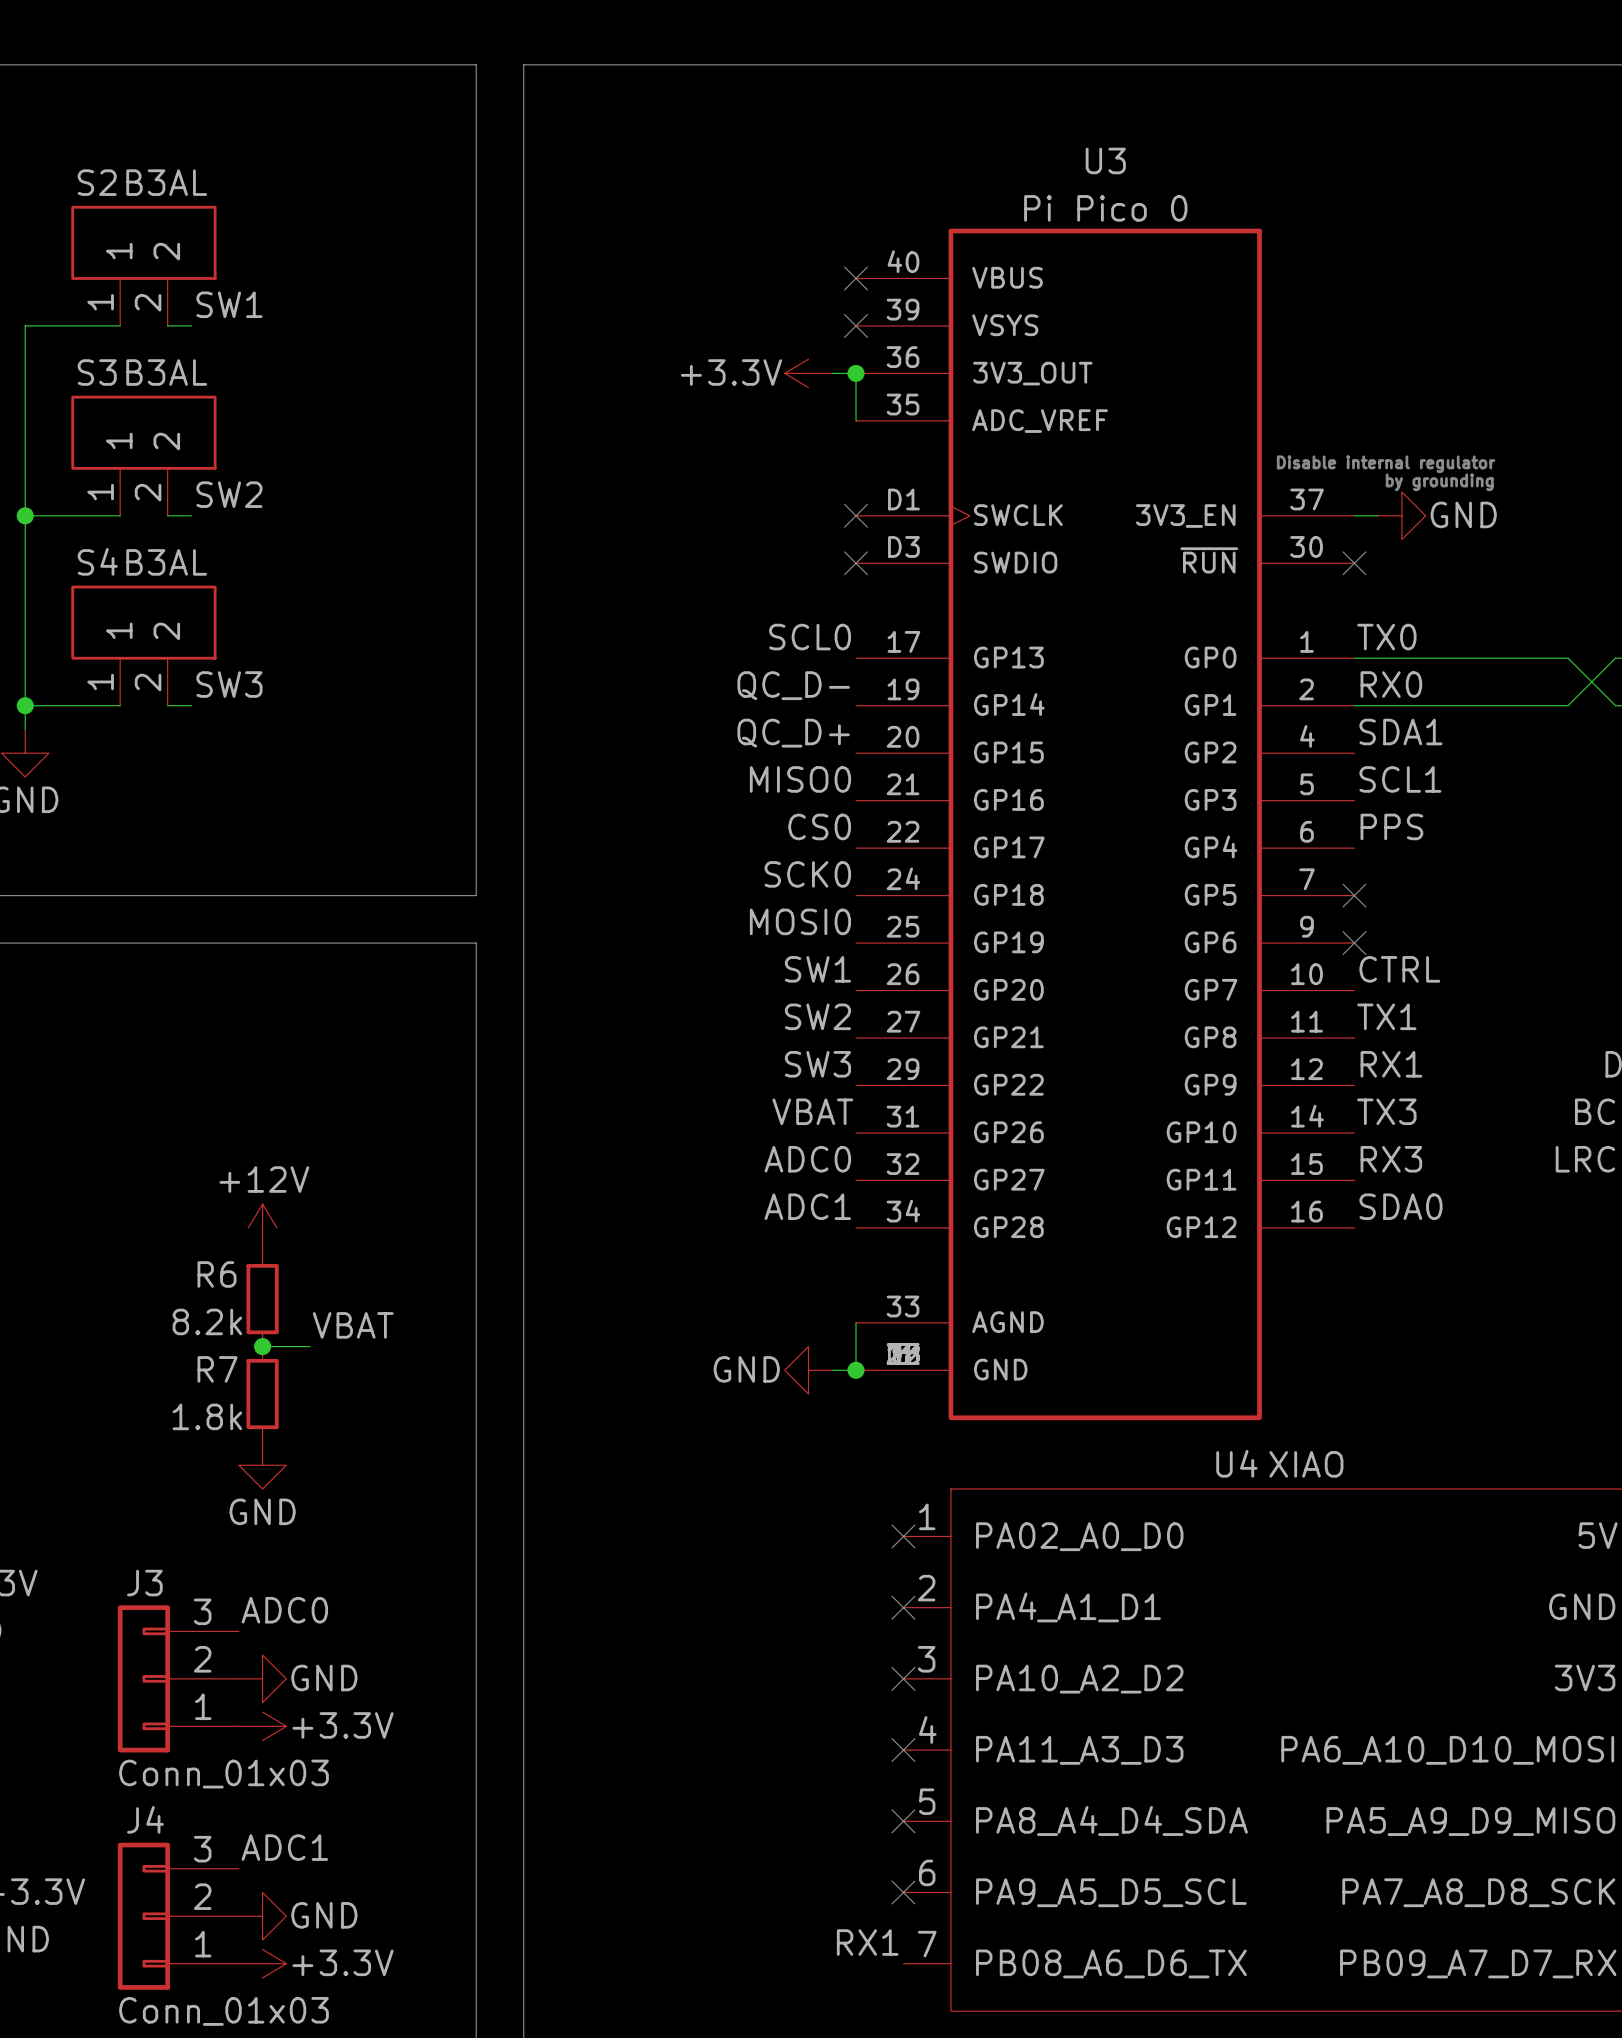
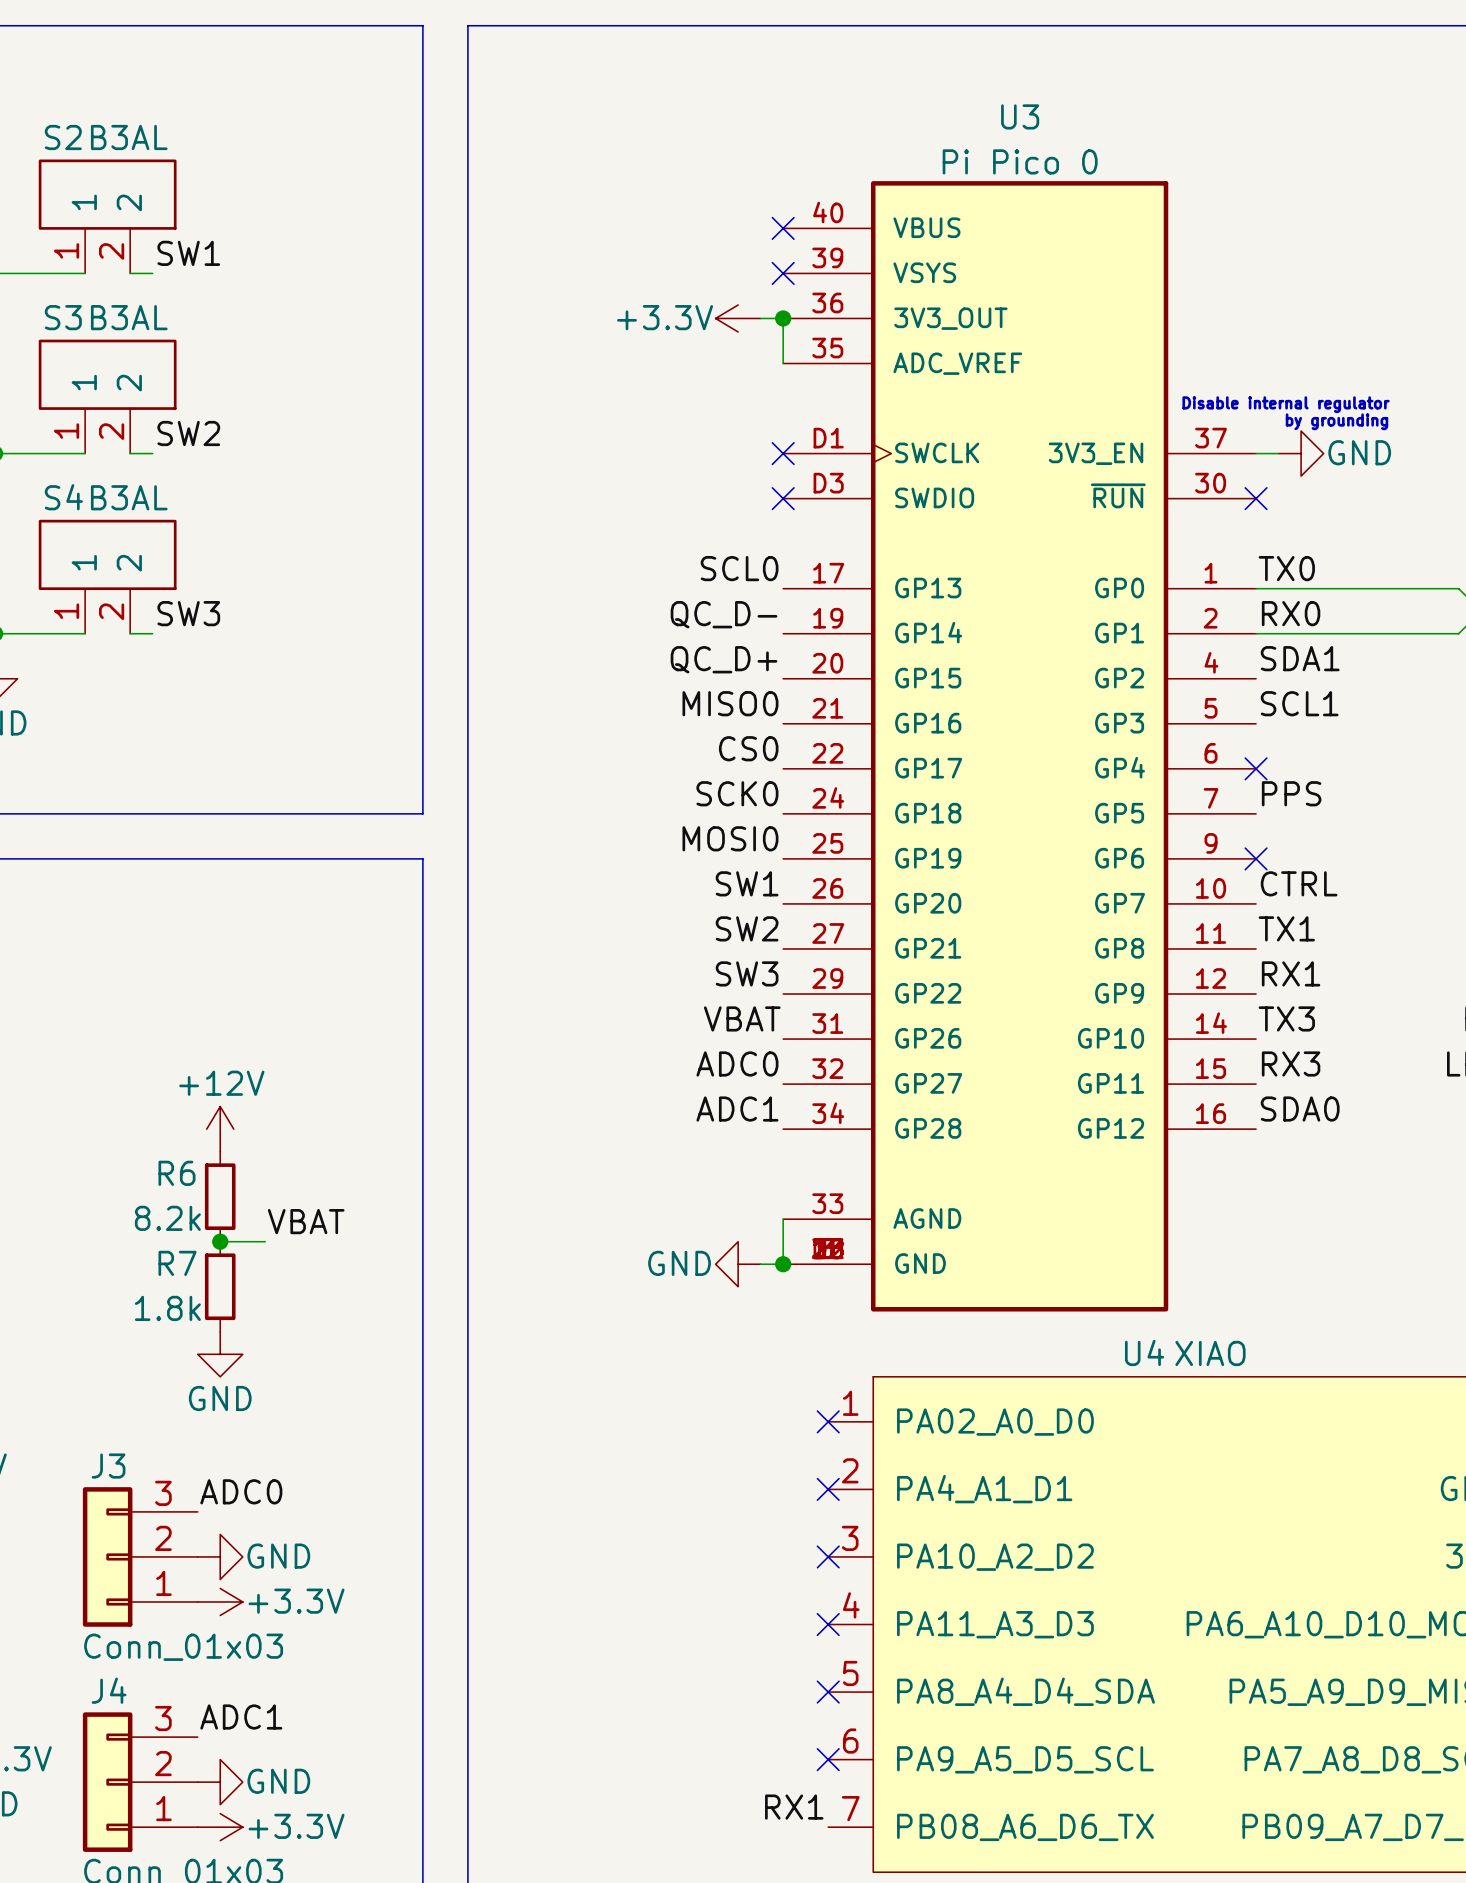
label position: PPS (1391, 826) -> PPS (1291, 793)
no-connect mark position: (1354, 895) -> (1256, 768)

